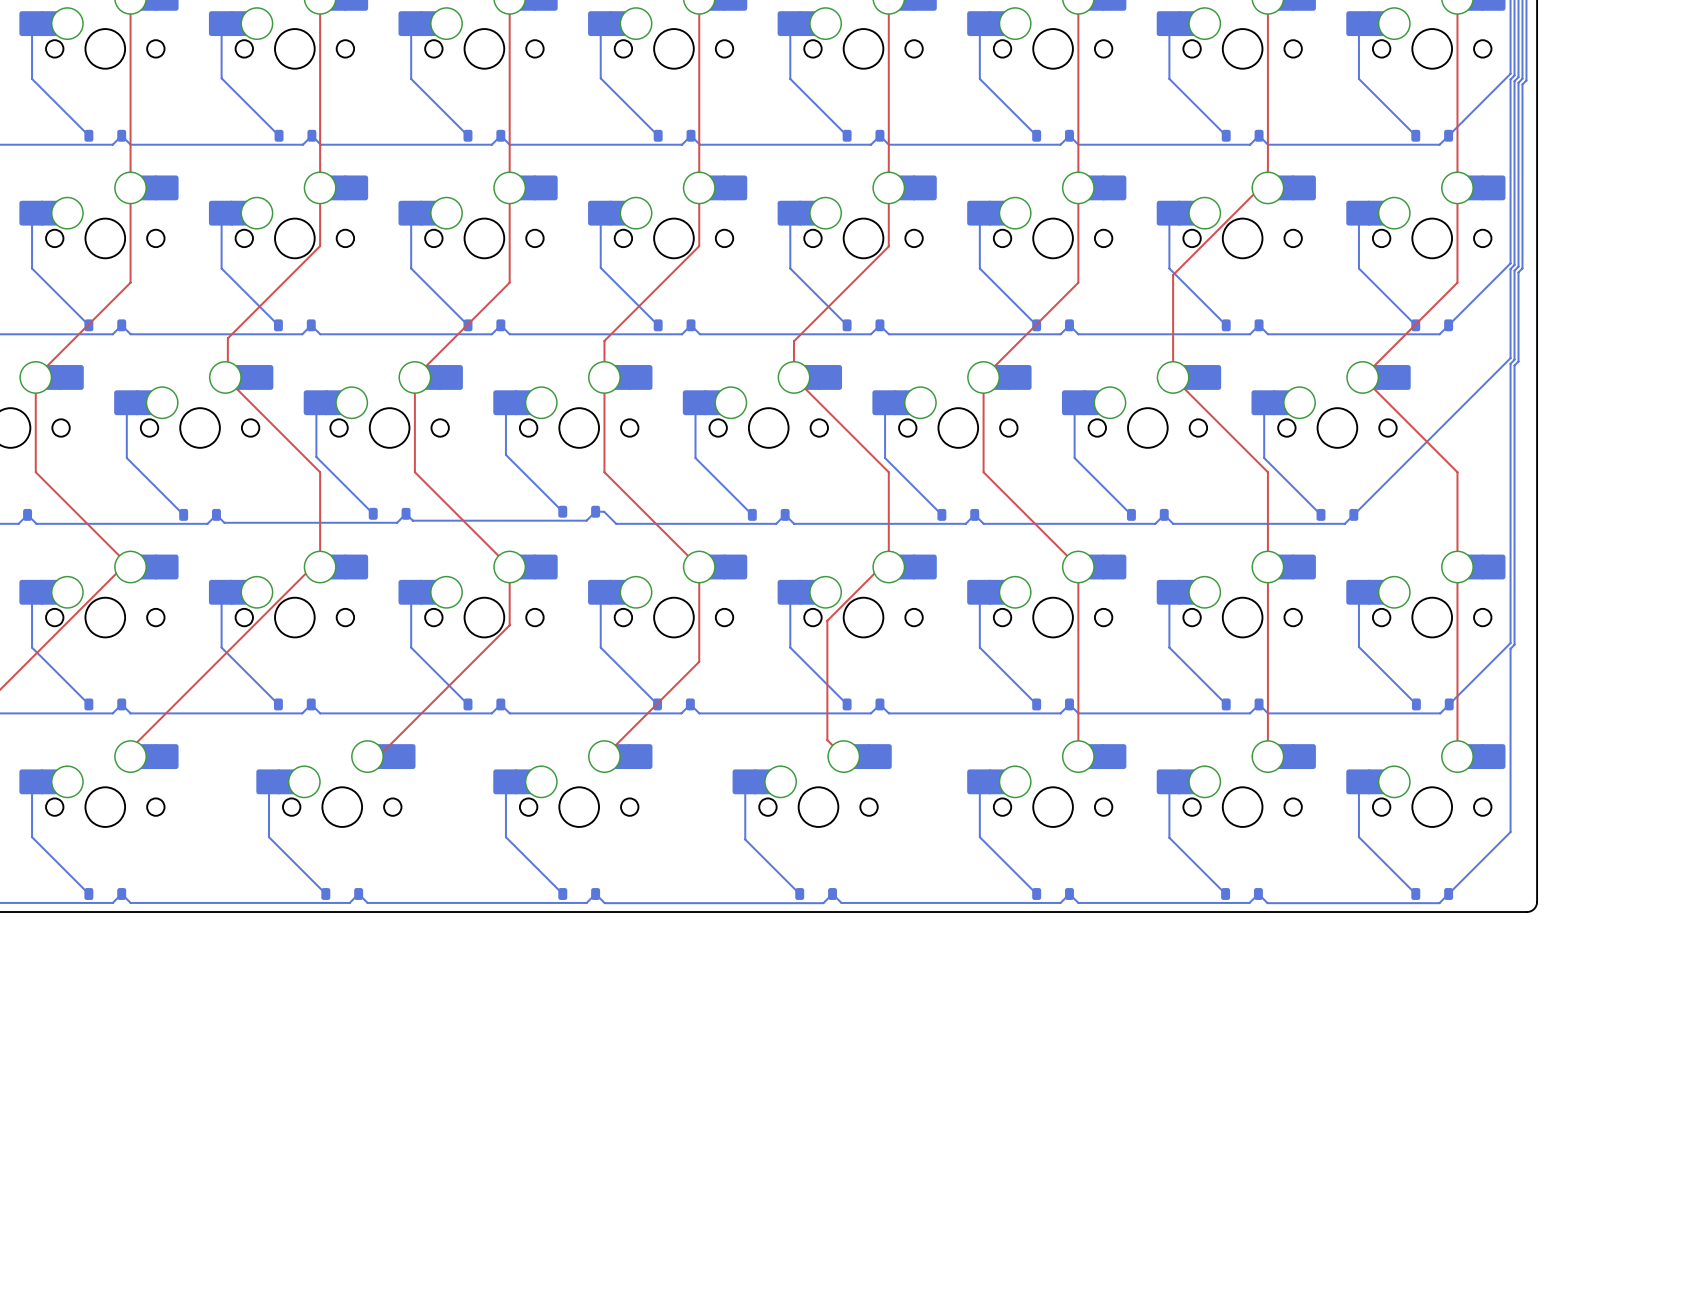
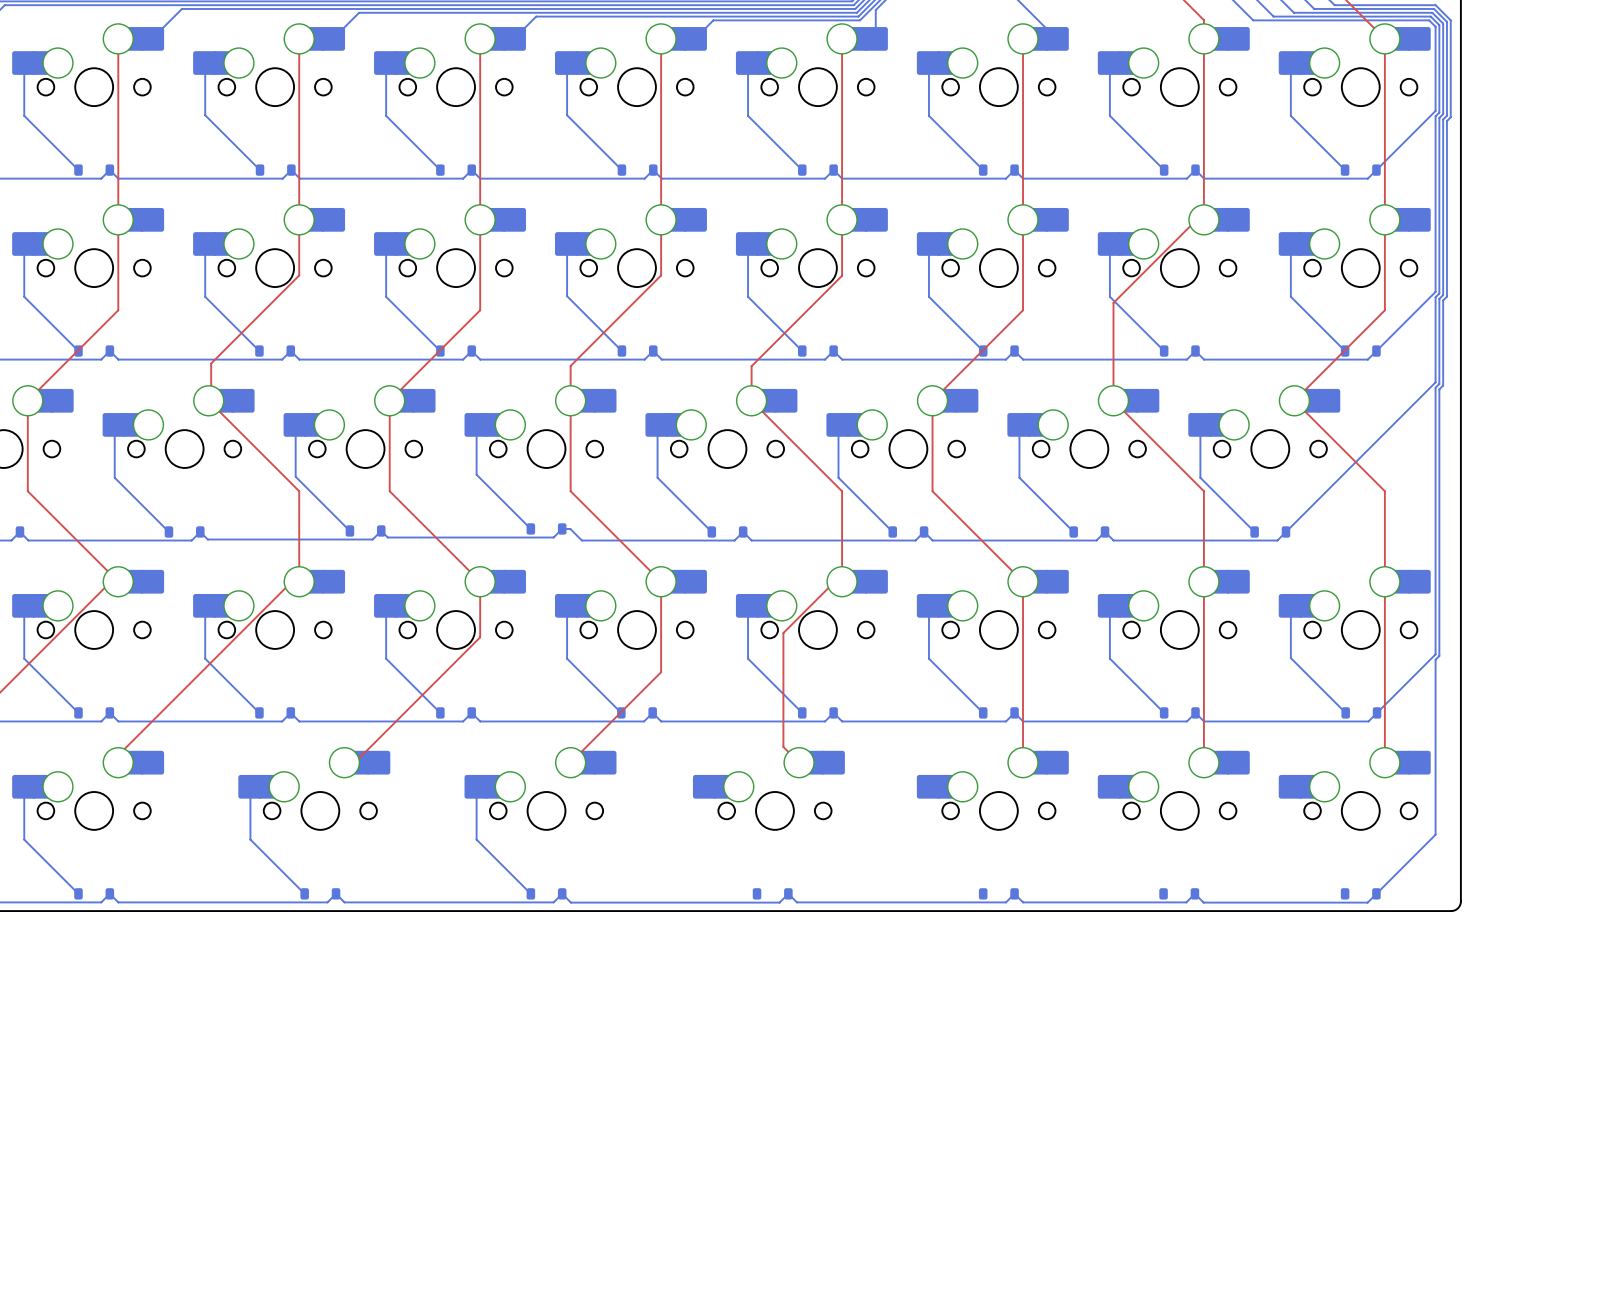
bottom track: (745, 781) (745, 839) (799, 894) -> none
bottom track: (979, 781) (979, 837) (1036, 894) -> none
bottom track: (1169, 781) (1169, 837) (1225, 894) -> none
bottom track: (1358, 781) (1358, 837) (1415, 894) -> none

